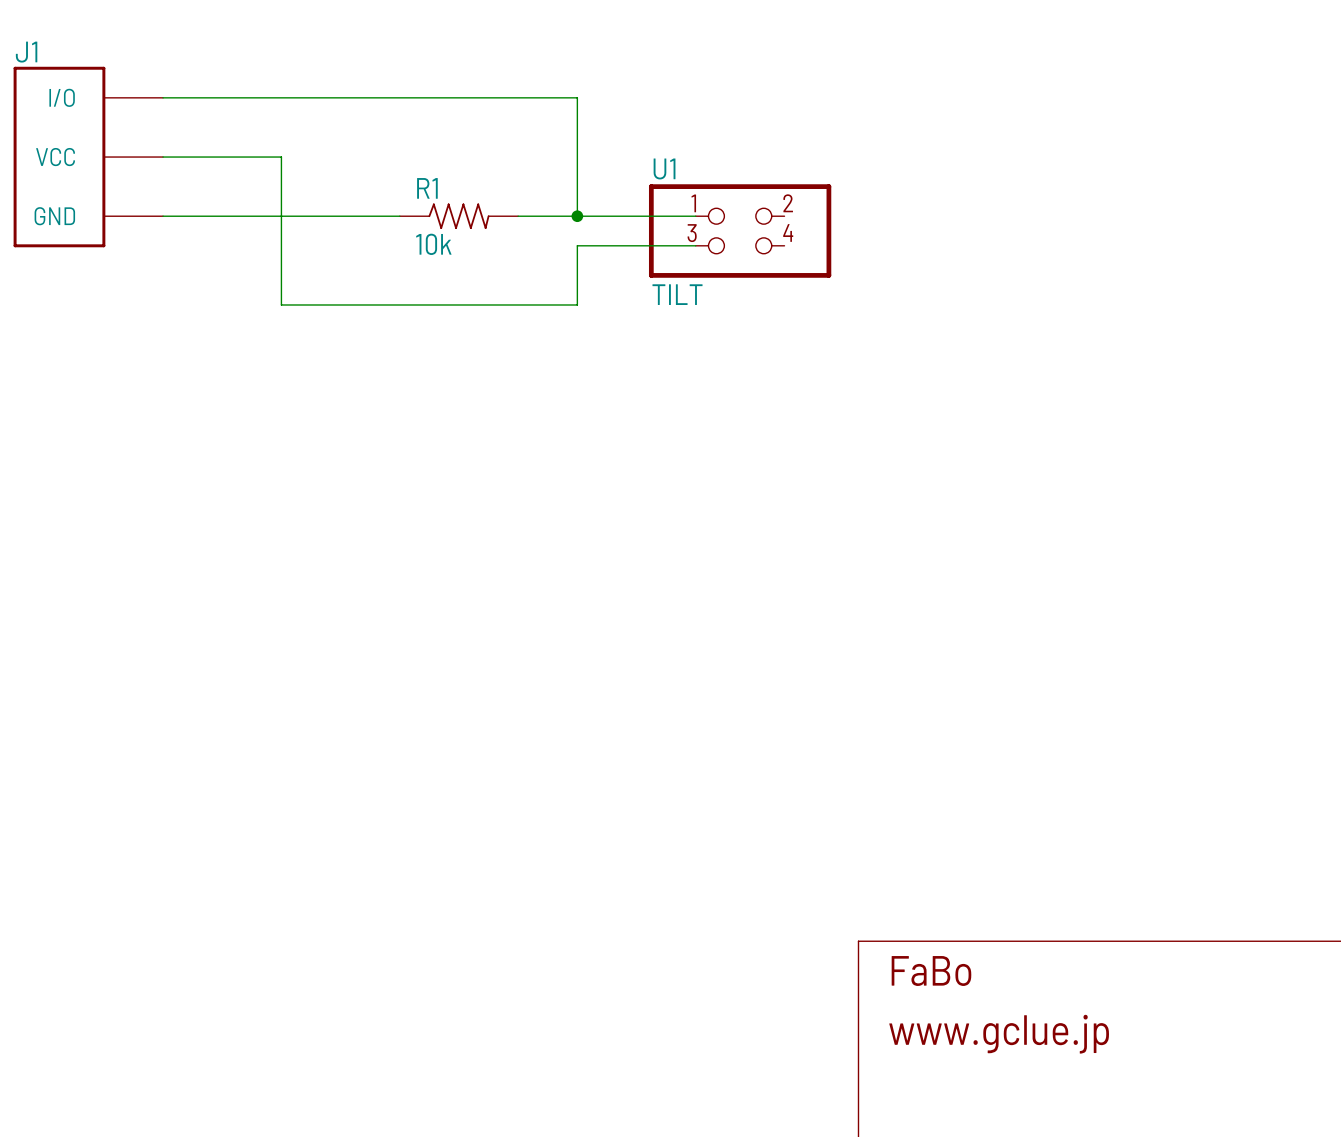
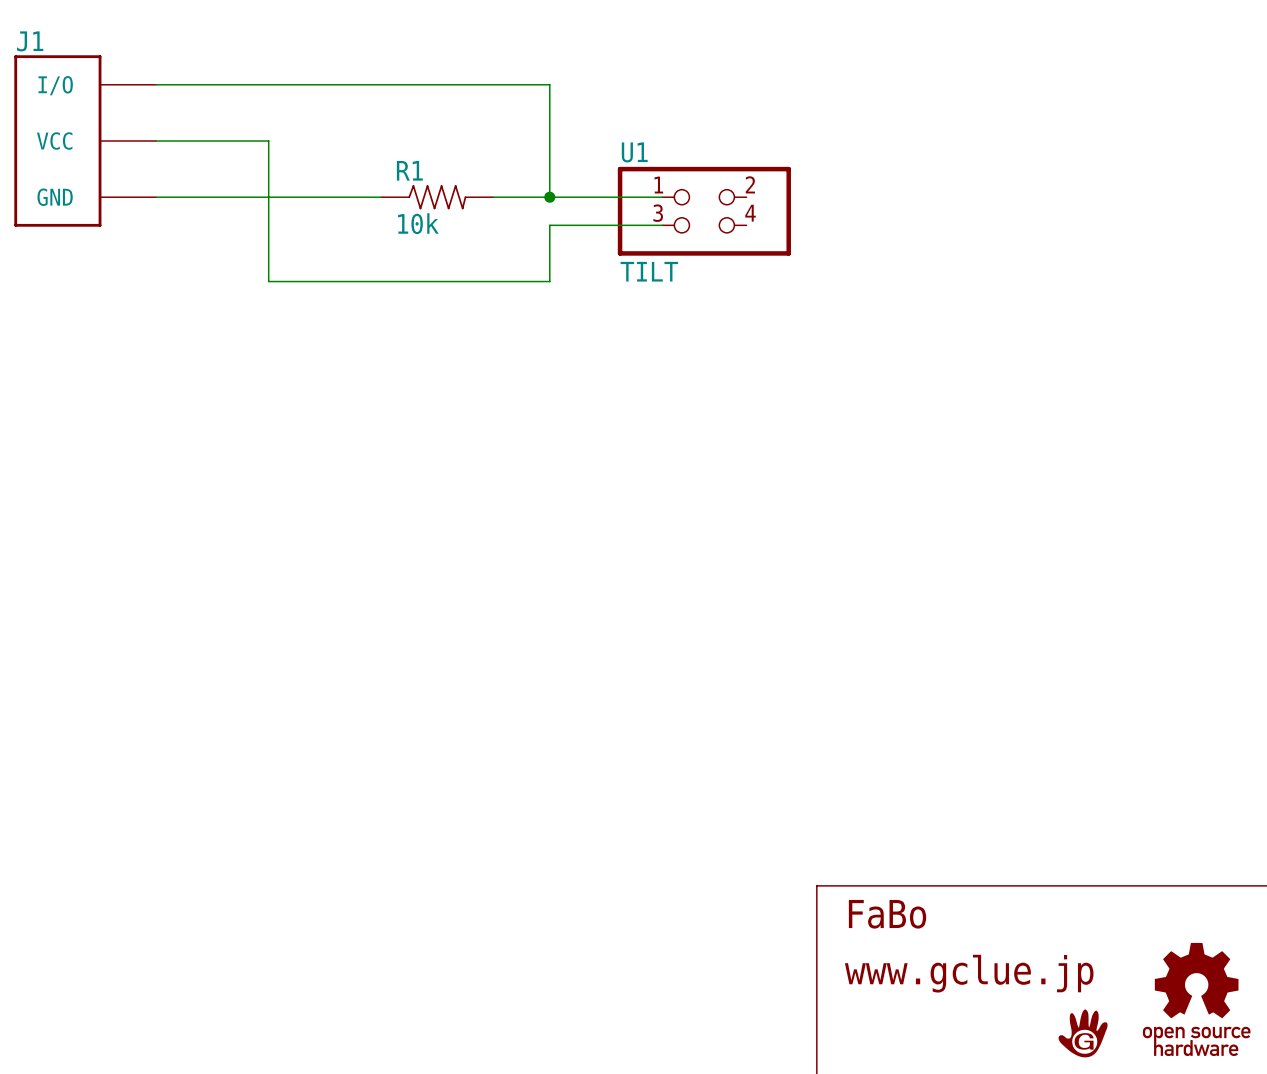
part: none -> (1196, 999)
part: none -> (1083, 1033)

